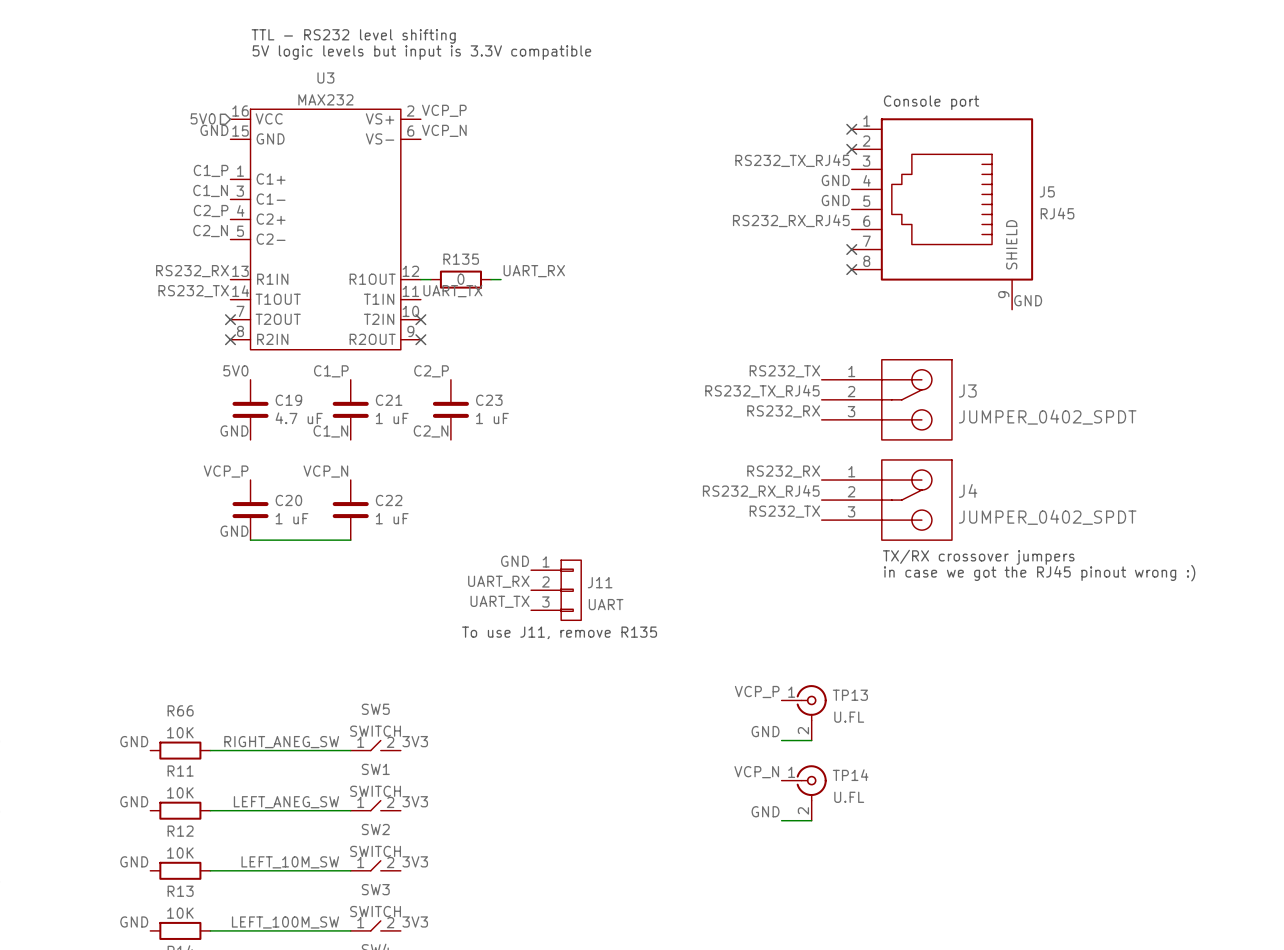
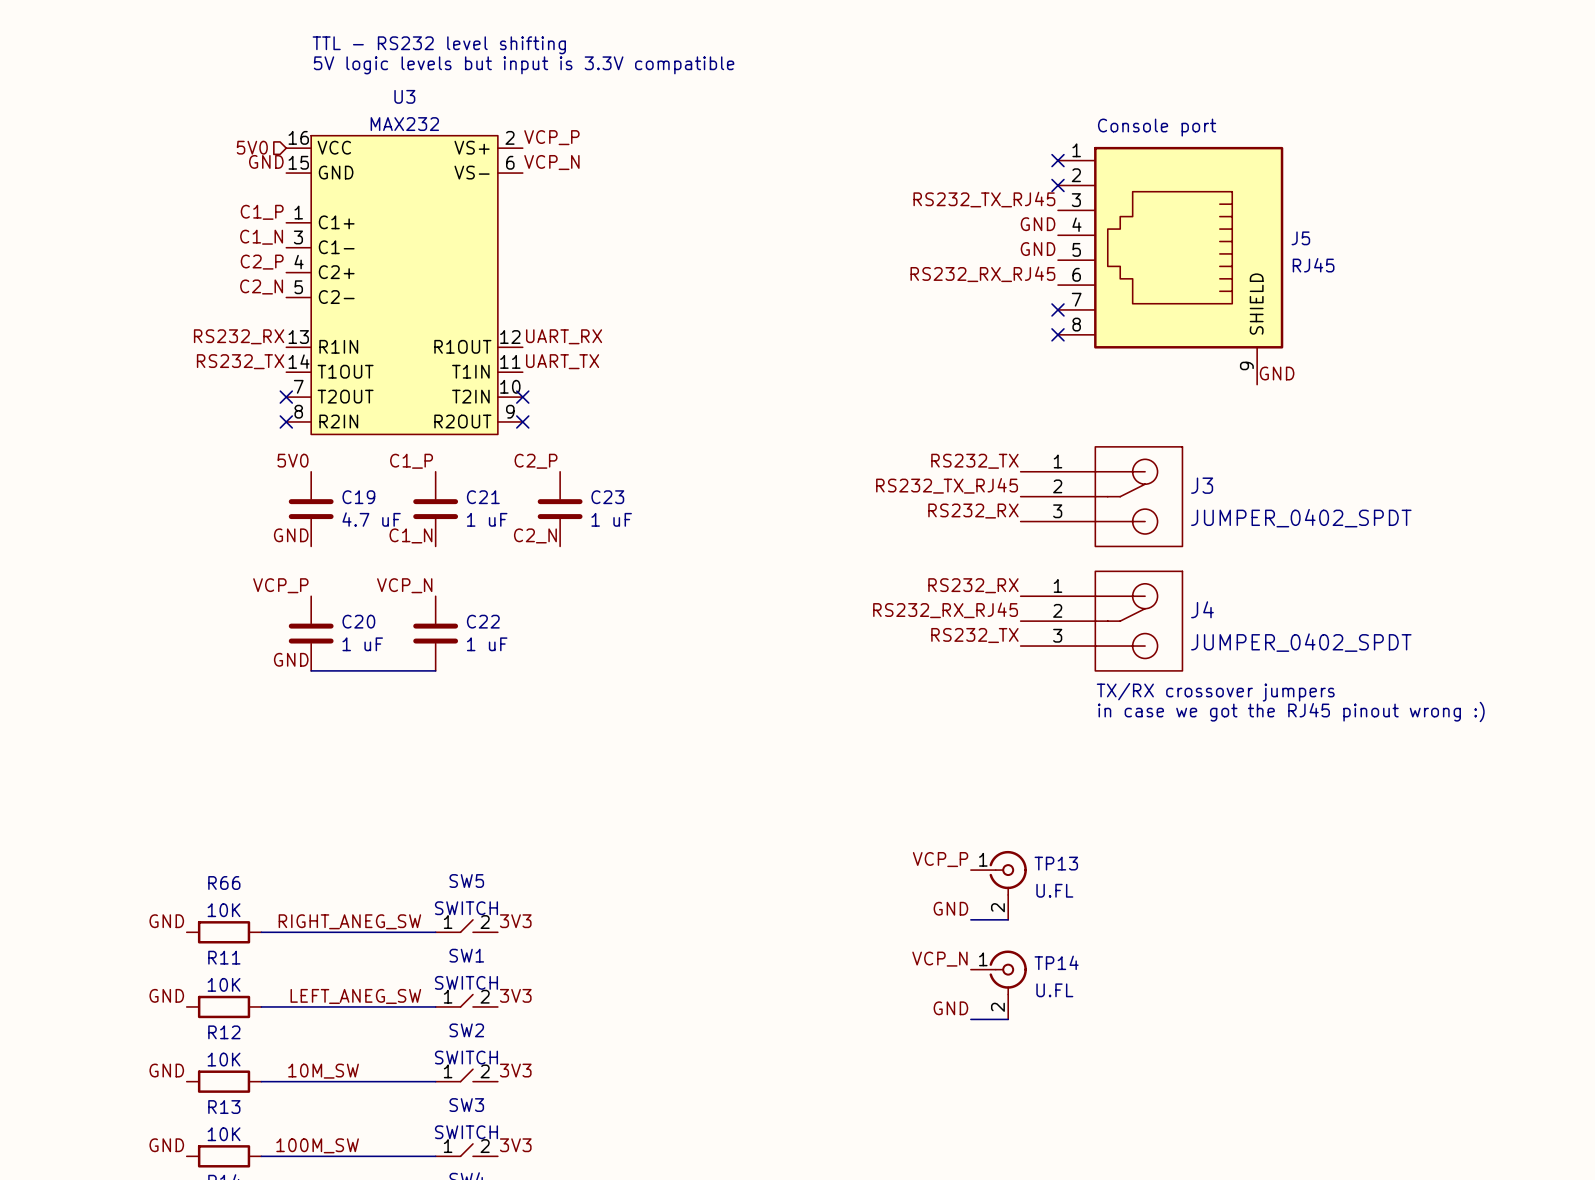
label position: UART_RX (534, 271) -> UART_RX (564, 336)
wire: (420, 279) (430, 279) -> none
R135: 0 (460, 279) -> none
wire: (491, 279) (501, 279) -> none
label: GND (515, 561) -> none
label: UART_RX (498, 581) -> none
J11: UART (556, 590) -> none
label: UART_TX (500, 601) -> none
text: To use J11, remove R135 (559, 632) -> none
label: LEFT_10M_SW (290, 862) -> 10M_SW (323, 1071)
label: LEFT_100M_SW (285, 922) -> 100M_SW (317, 1145)

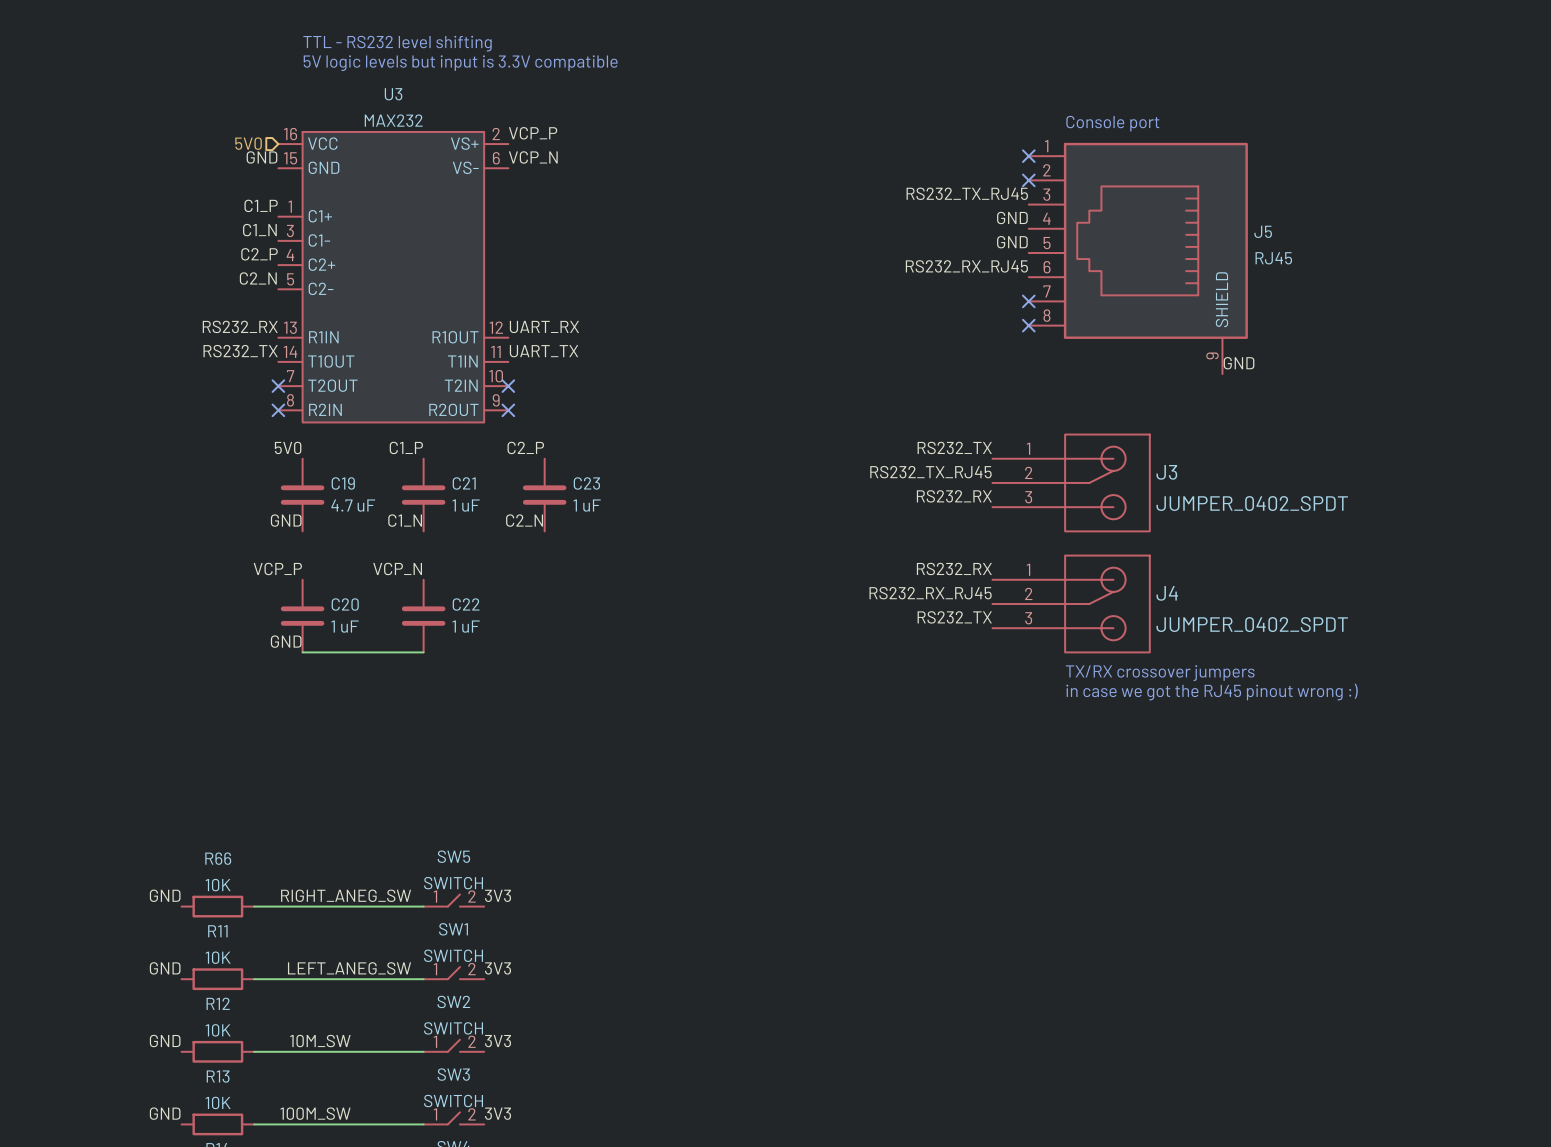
label: VCP_P (940, 859) -> none
TP13: U.FL (998, 885) -> none
label: GND (950, 908) -> none
wire: (970, 919) (1008, 919) -> none
label: VCP_N (939, 959) -> none
TP14: U.FL (998, 984) -> none
label: GND (950, 1008) -> none
wire: (970, 1019) (1008, 1019) -> none

